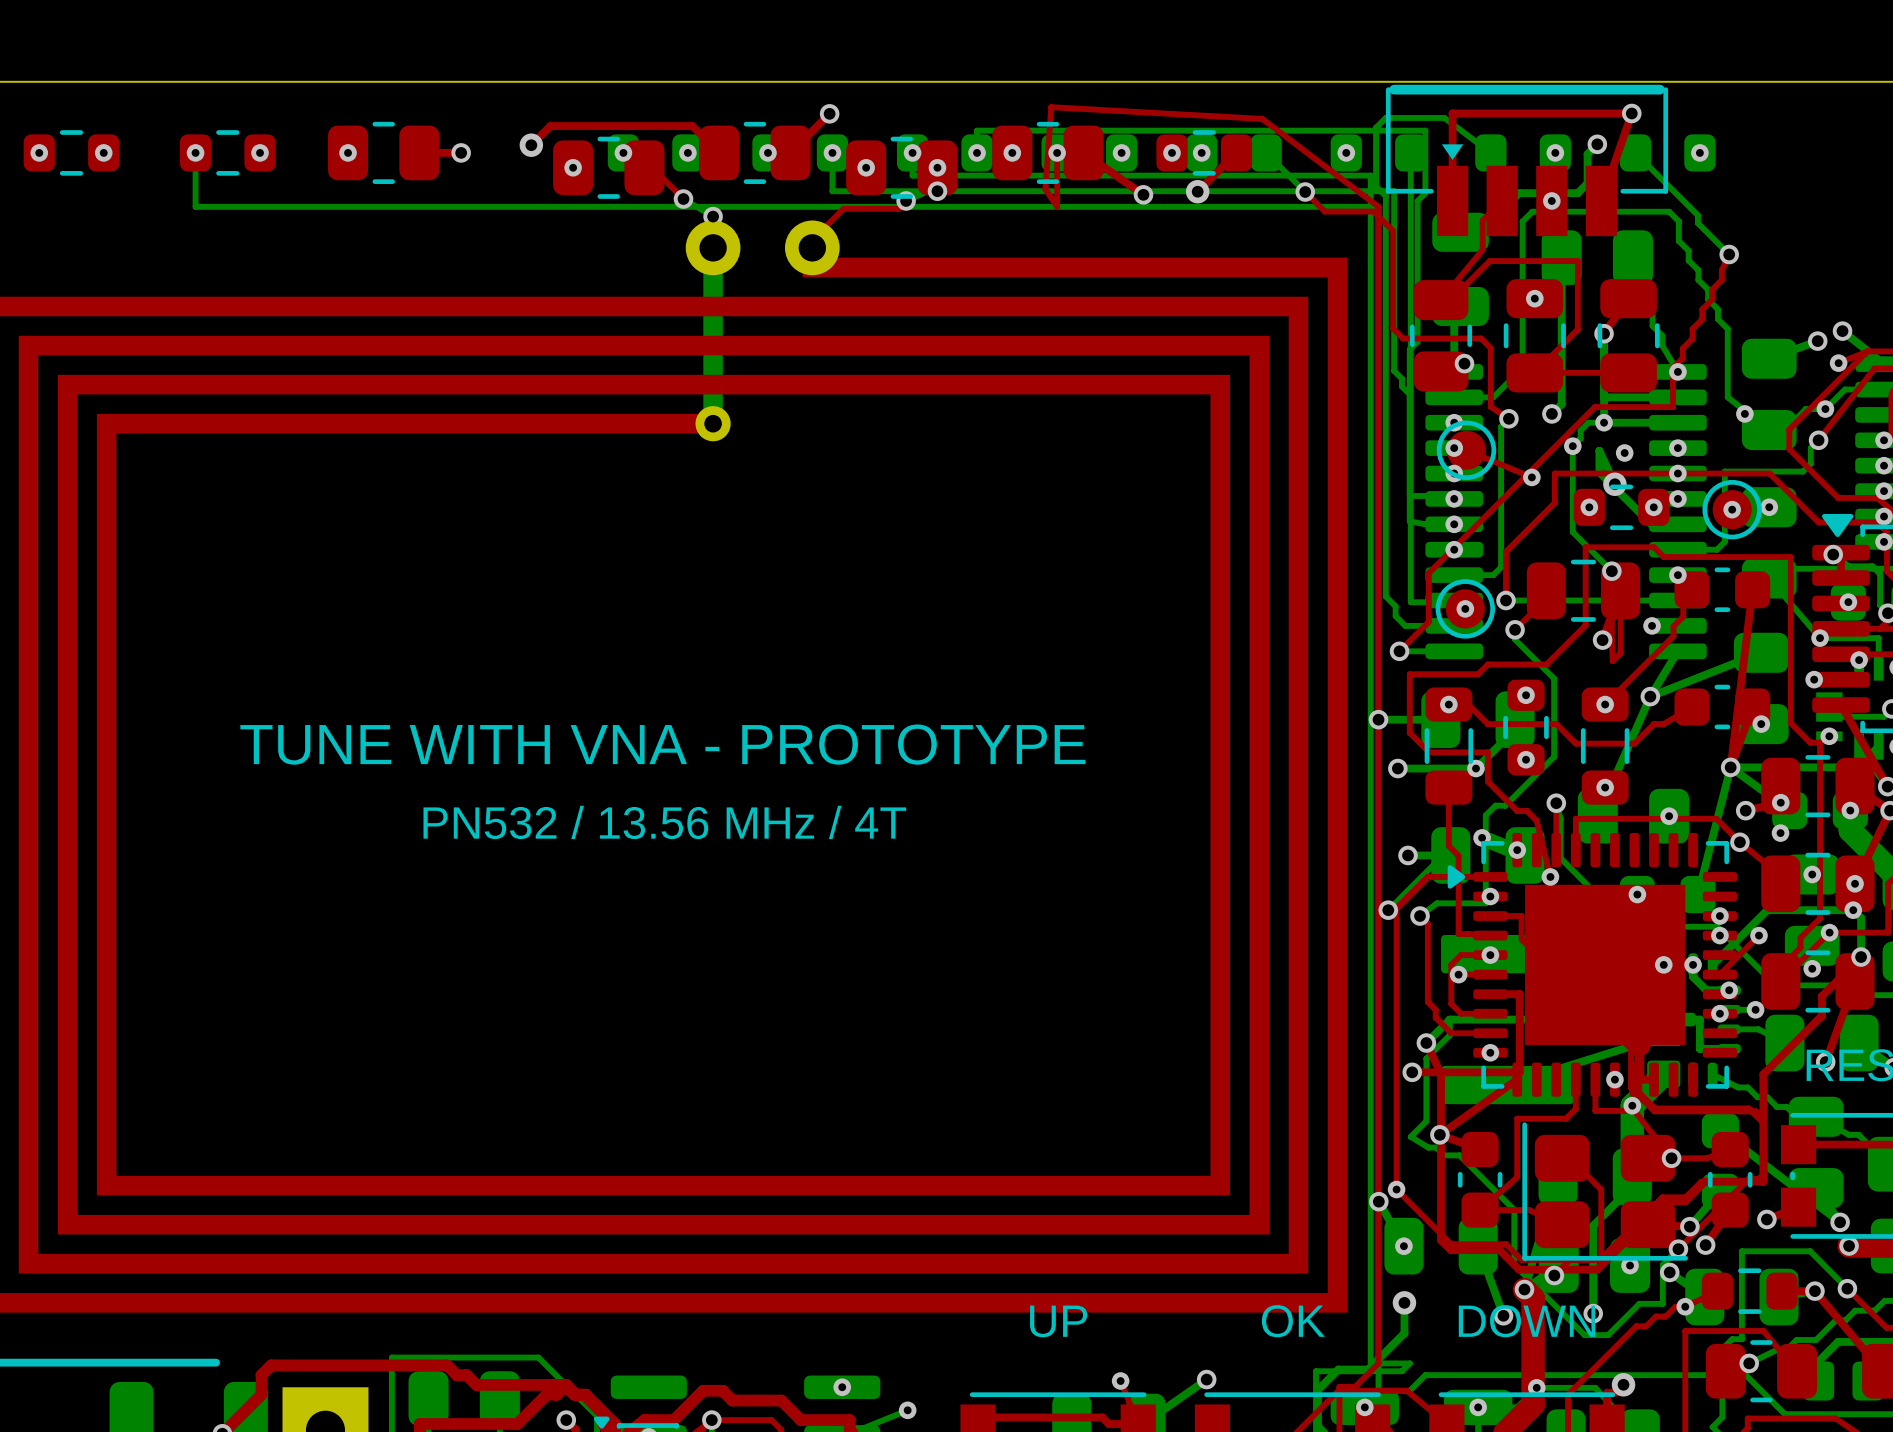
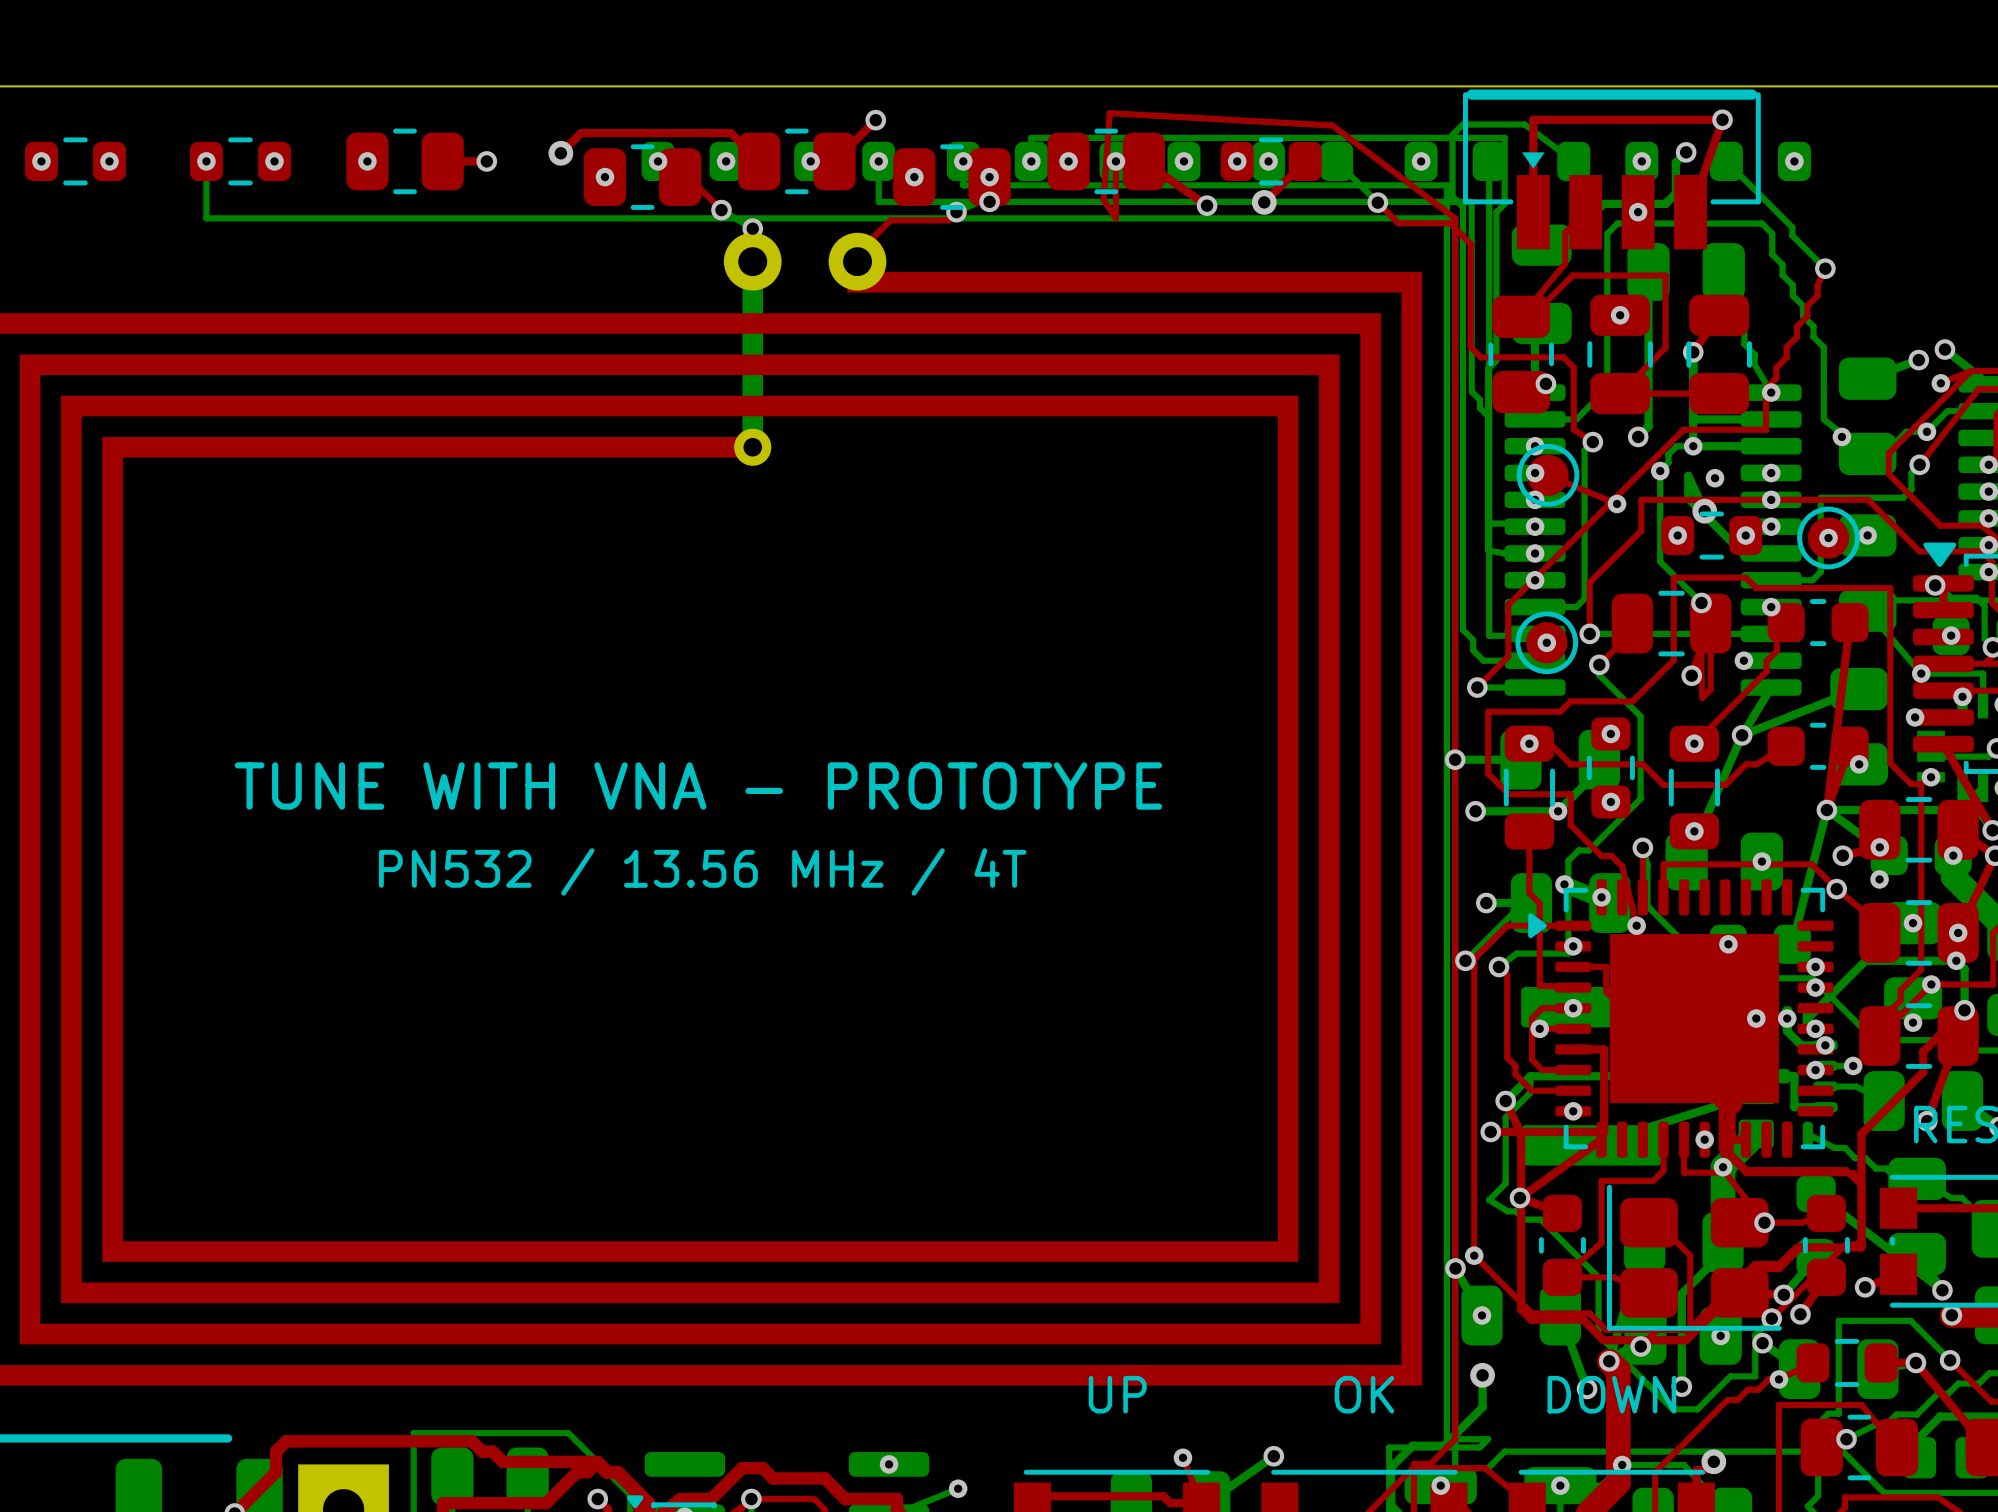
top track: (1759, 935) (1719, 974) -> none
via position: (1759, 935) -> (1815, 1028)

